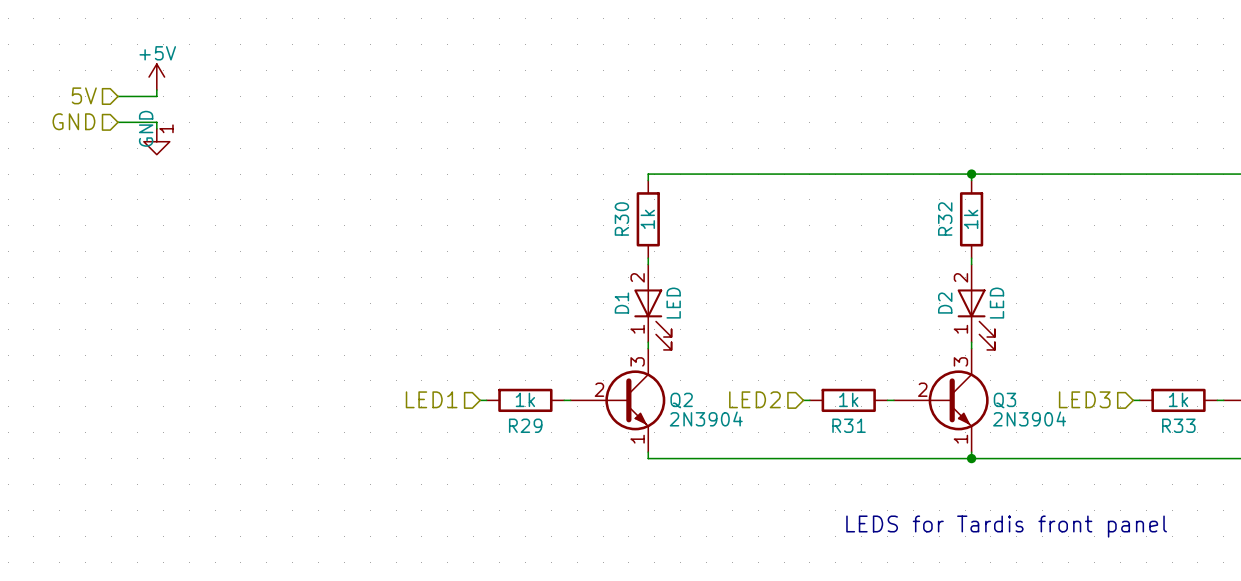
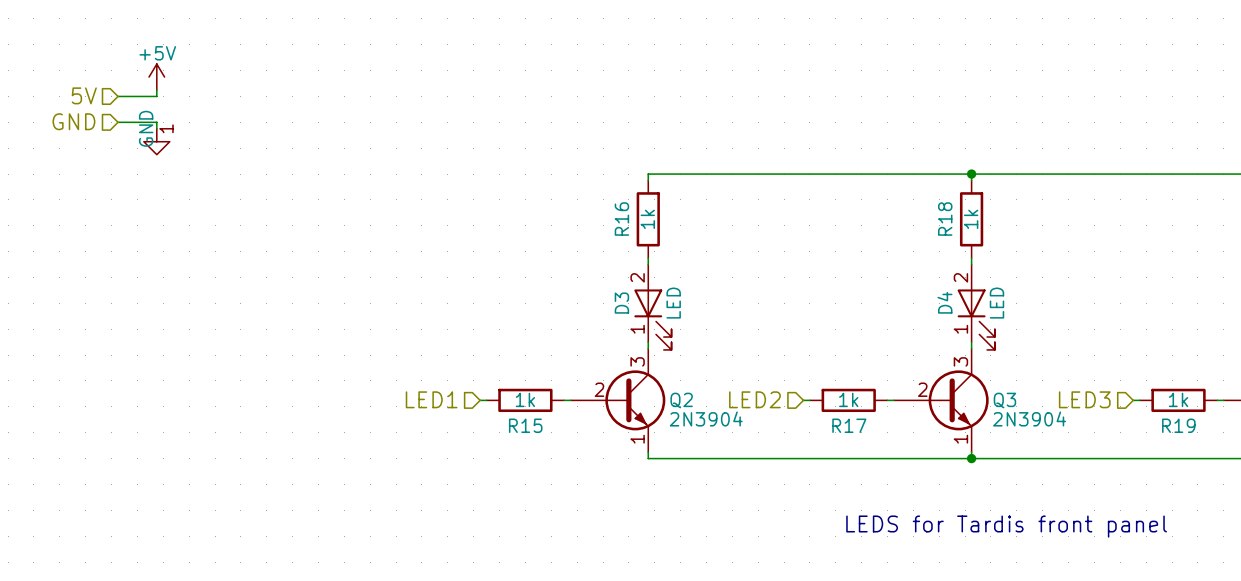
R30 name: R30 (621, 219) -> R16 (621, 219)
R32 name: R32 (945, 219) -> R18 (945, 219)
D1 name: D1 (621, 303) -> D3 (621, 303)
D2 name: D2 (945, 303) -> D4 (944, 302)
R29 name: R29 (525, 425) -> R15 (525, 425)
R31 name: R31 (849, 425) -> R17 (849, 425)
R33 name: R33 (1178, 425) -> R19 (1178, 425)

